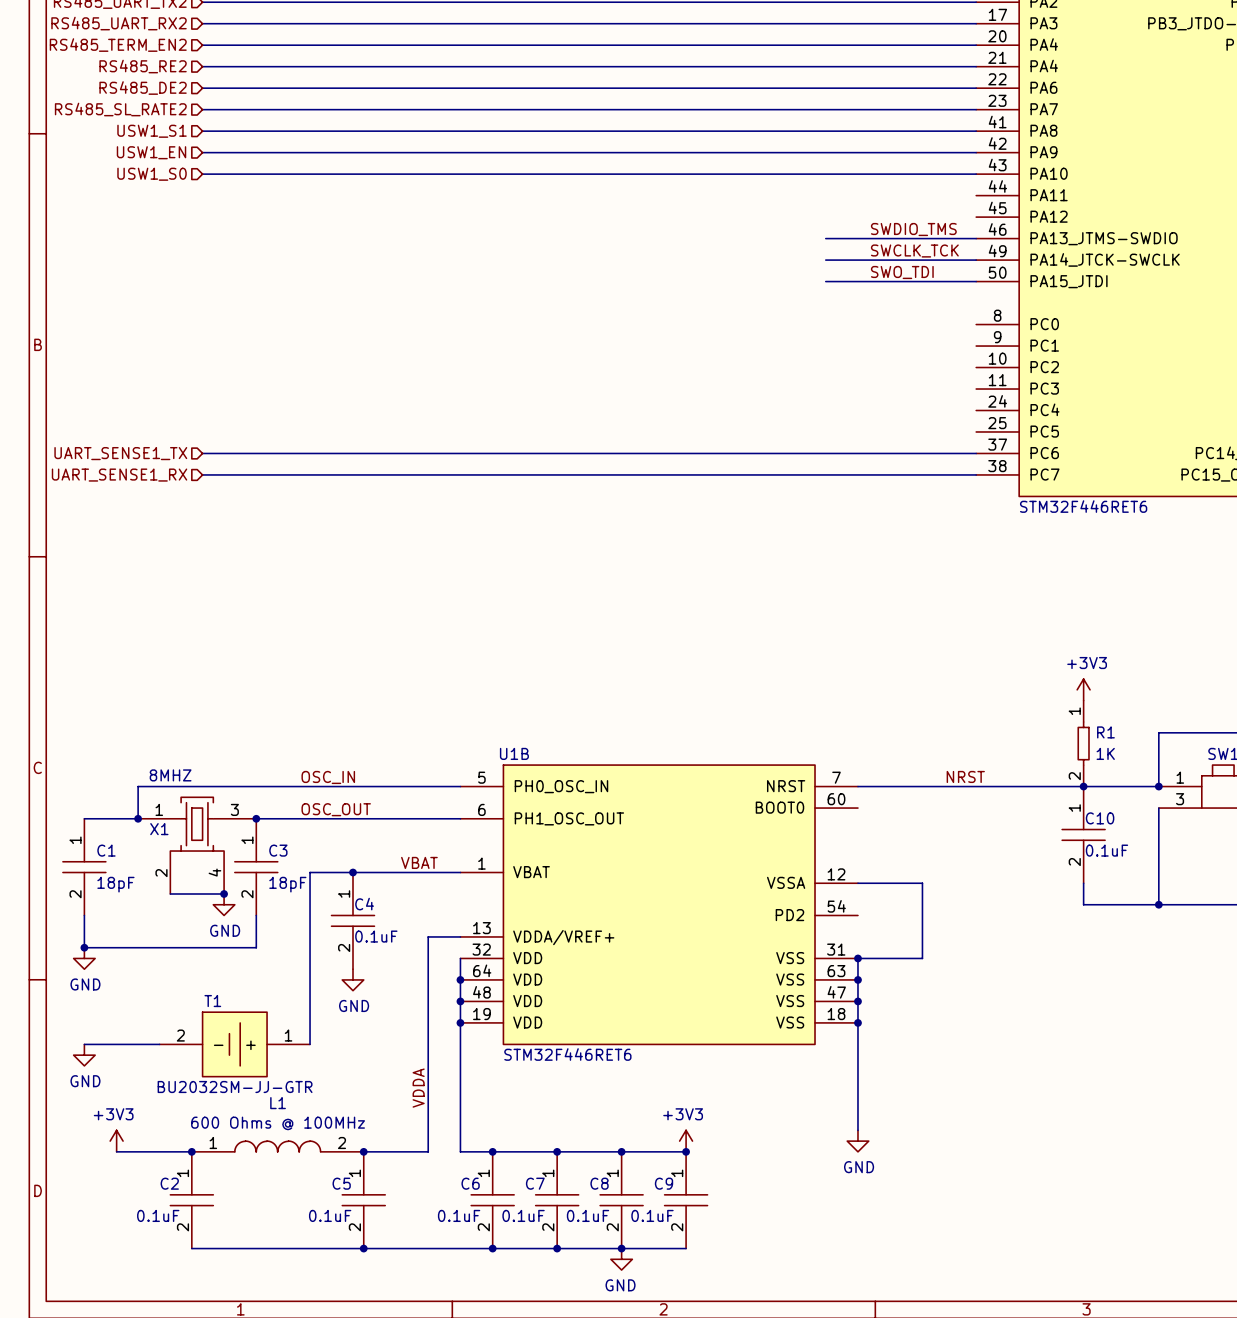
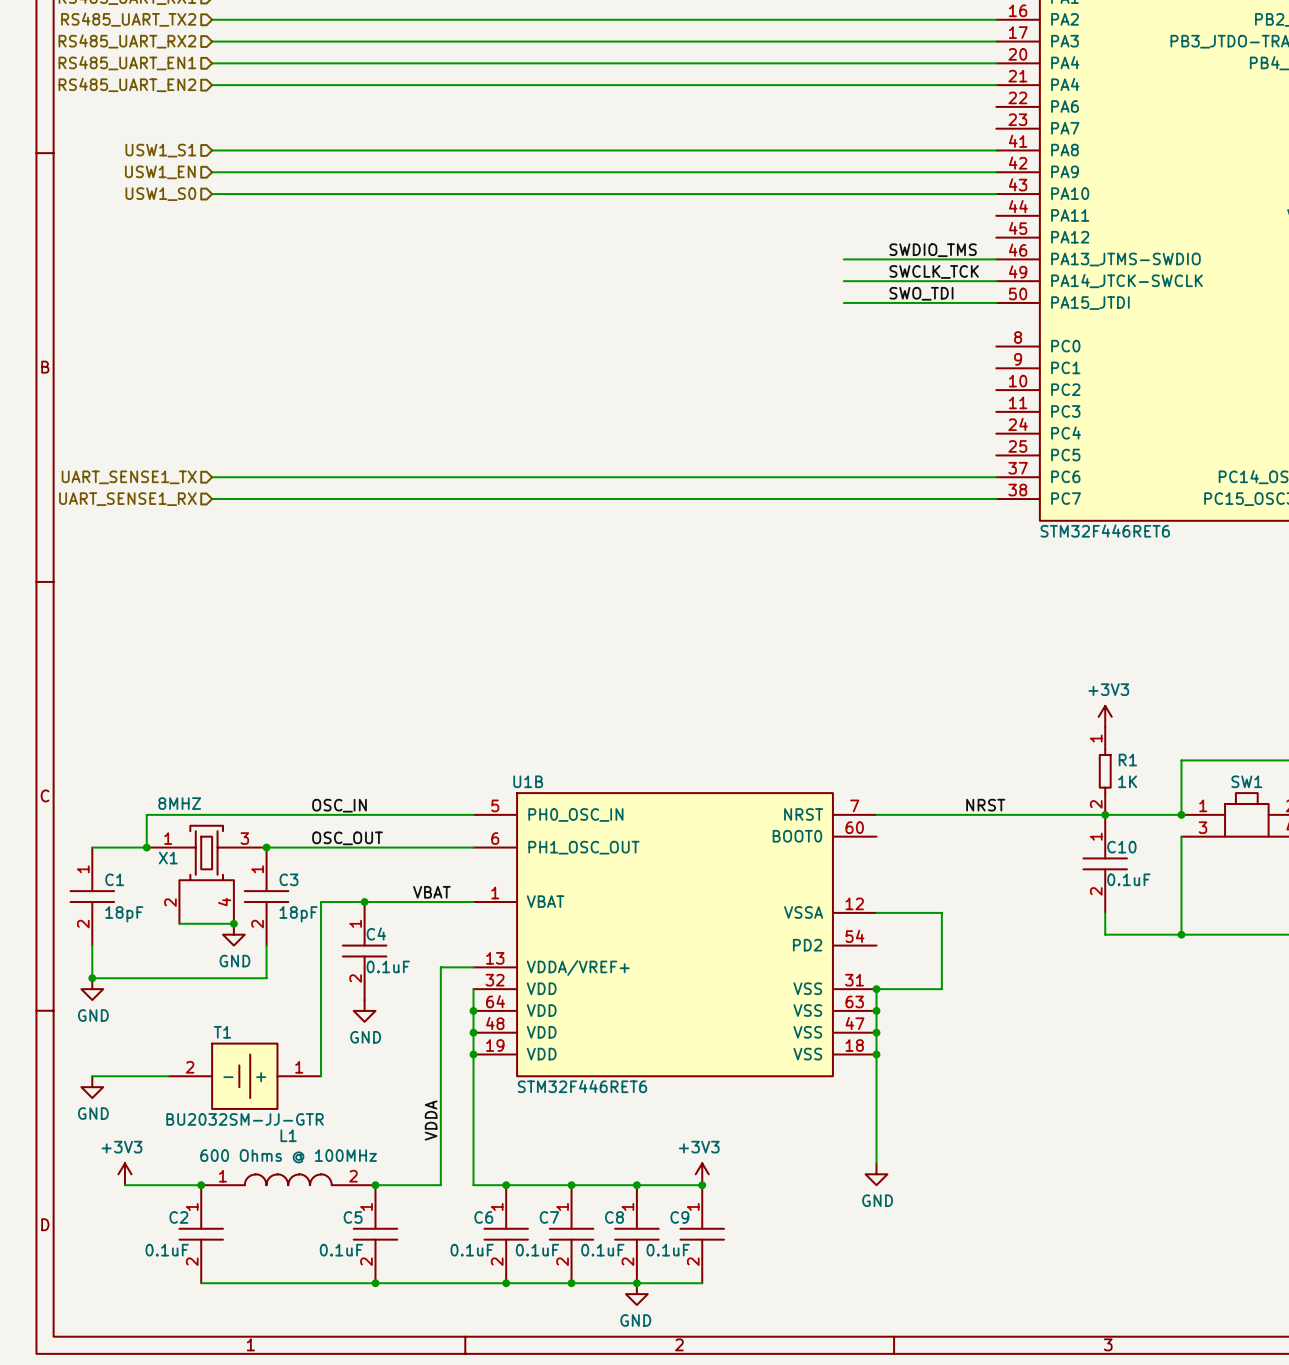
hierarchical label: RS485_TERM_EN2 (118, 45) -> RS485_UART_EN1 (127, 63)
hierarchical label: RS485_RE2 (143, 66) -> RS485_UART_EN2 (127, 84)
hierarchical label: RS485_DE2 (143, 88) -> none
wire: (202, 88) (976, 88) -> none
hierarchical label: RS485_SL_RATE2 (120, 109) -> none
wire: (202, 109) (976, 109) -> none

